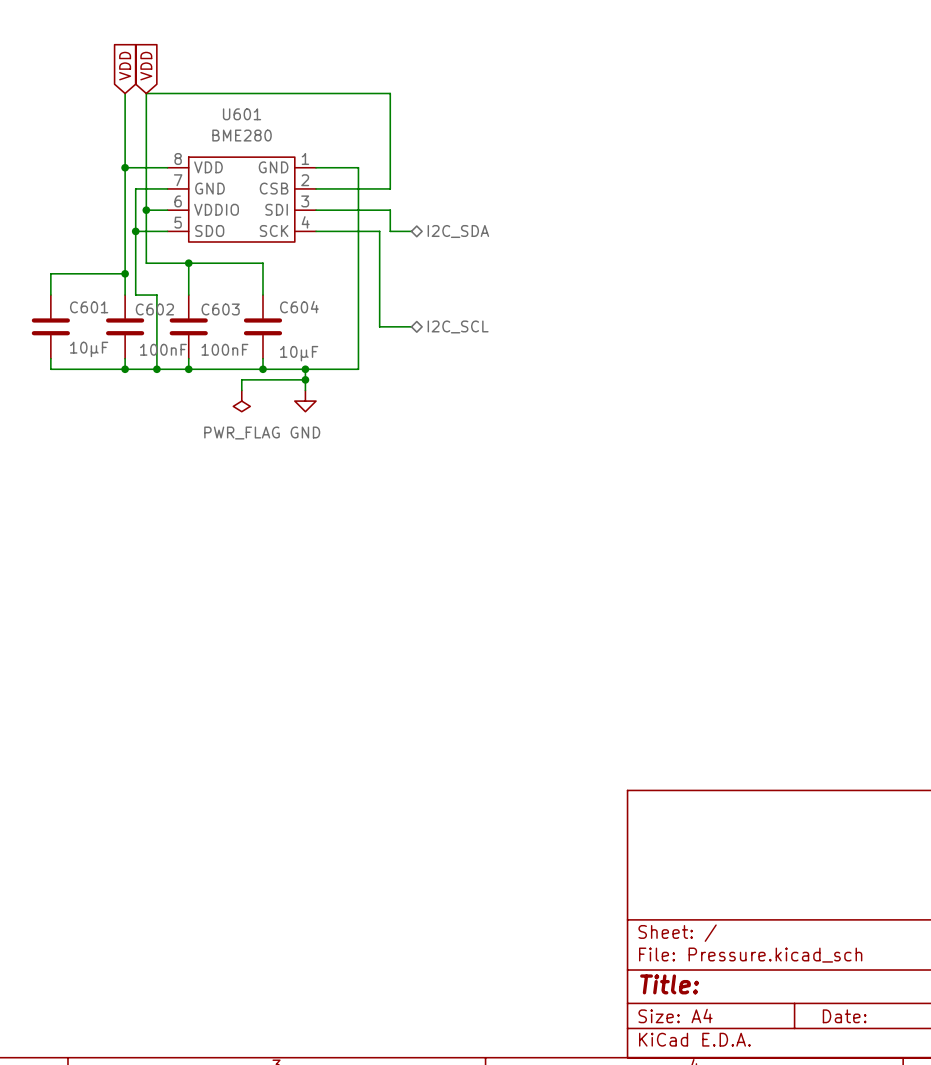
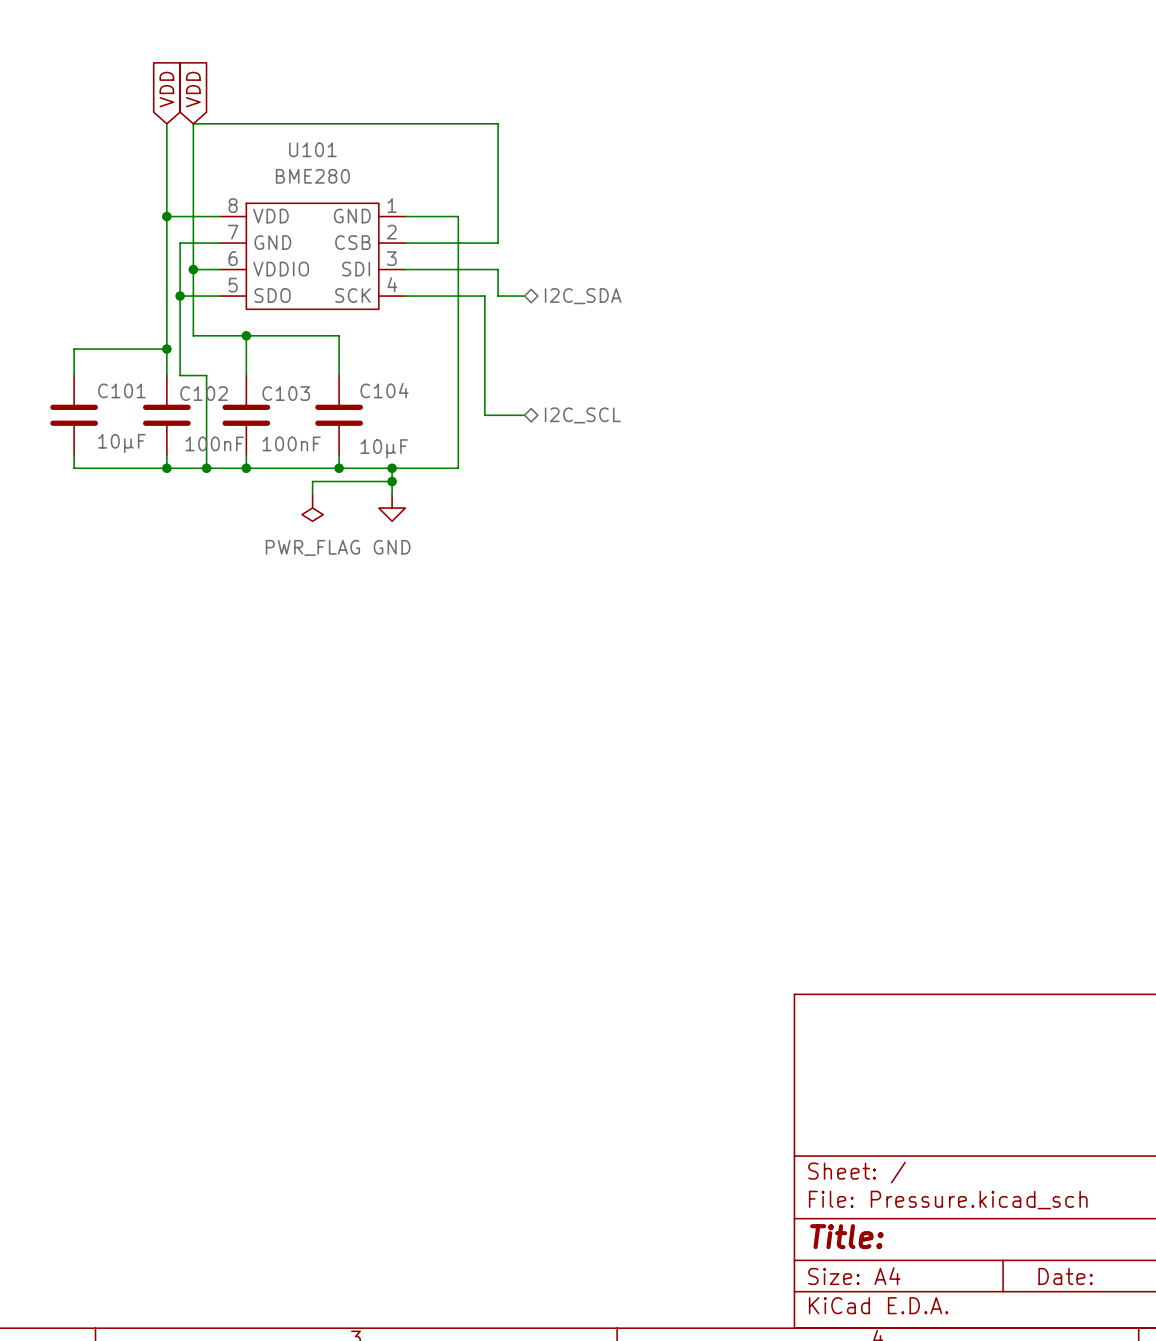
U601 name: U601 (242, 114) -> U101 (312, 149)
C601 name: C601 (89, 307) -> C101 (121, 390)
C604 name: C604 (299, 307) -> C104 (384, 390)
C602 name: C602 (154, 309) -> C102 (204, 393)
C603 name: C603 (220, 309) -> C103 (286, 393)

